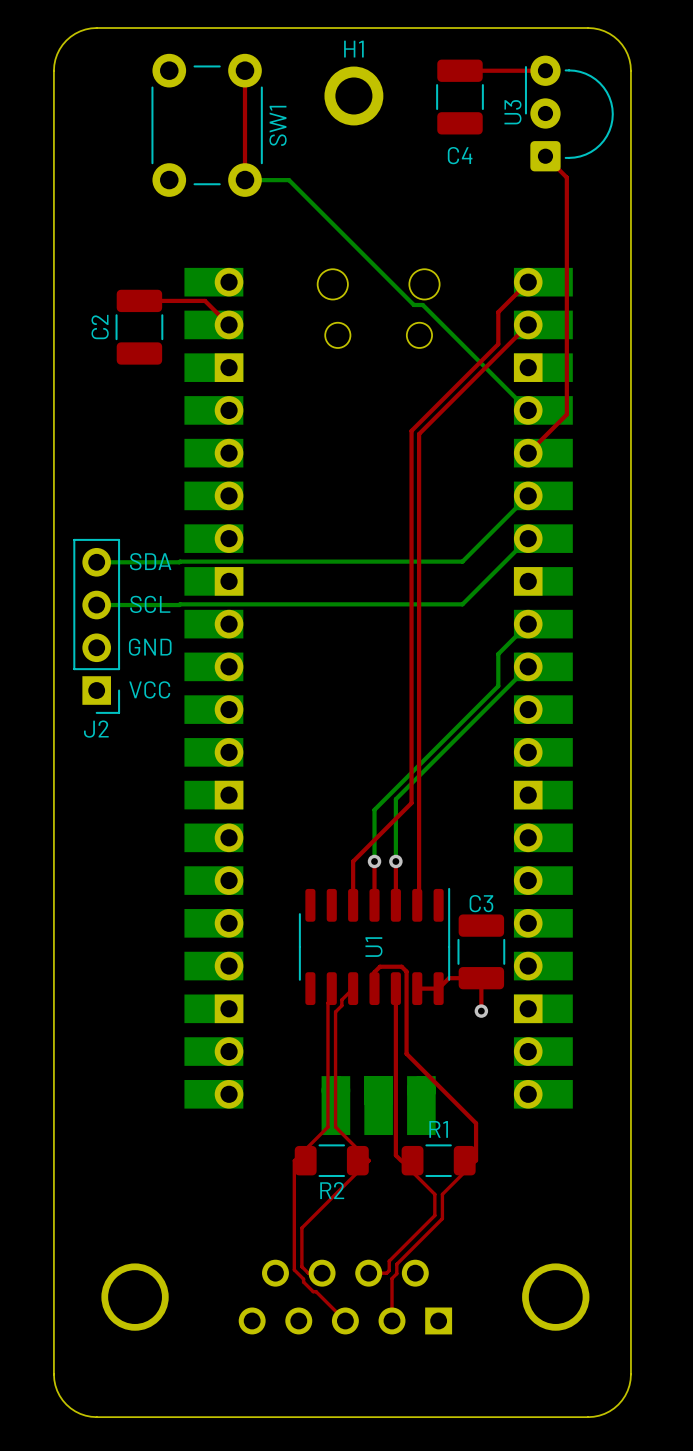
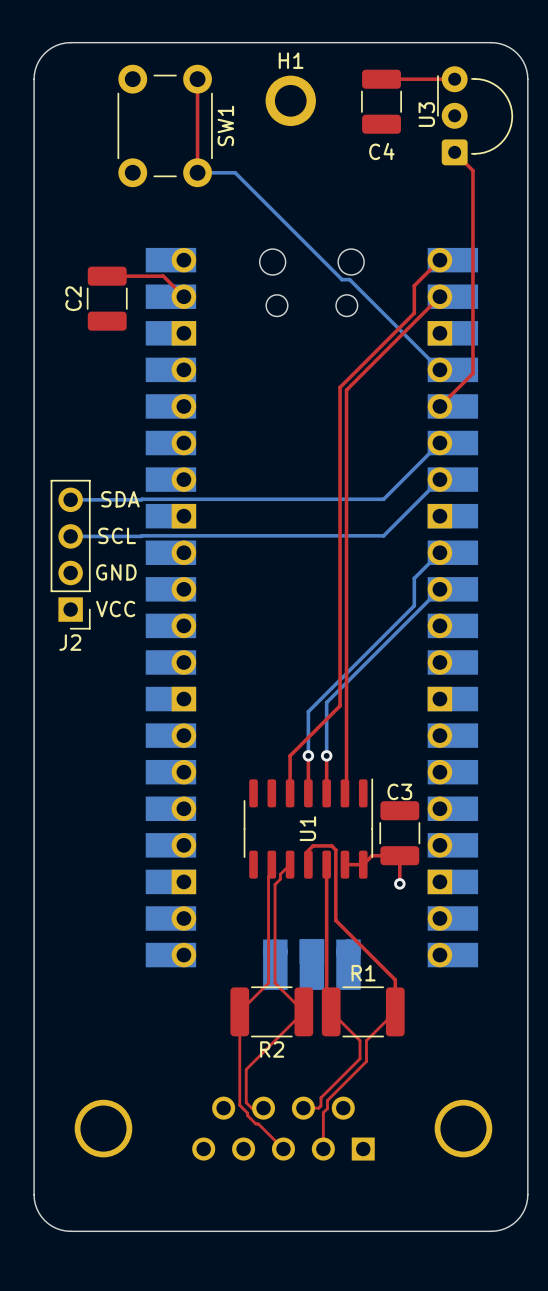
R2 footprint: [294, 1144, 369, 1178] -> [230, 986, 314, 1038]
R1 footprint: [401, 1144, 476, 1178] -> [321, 986, 405, 1038]

